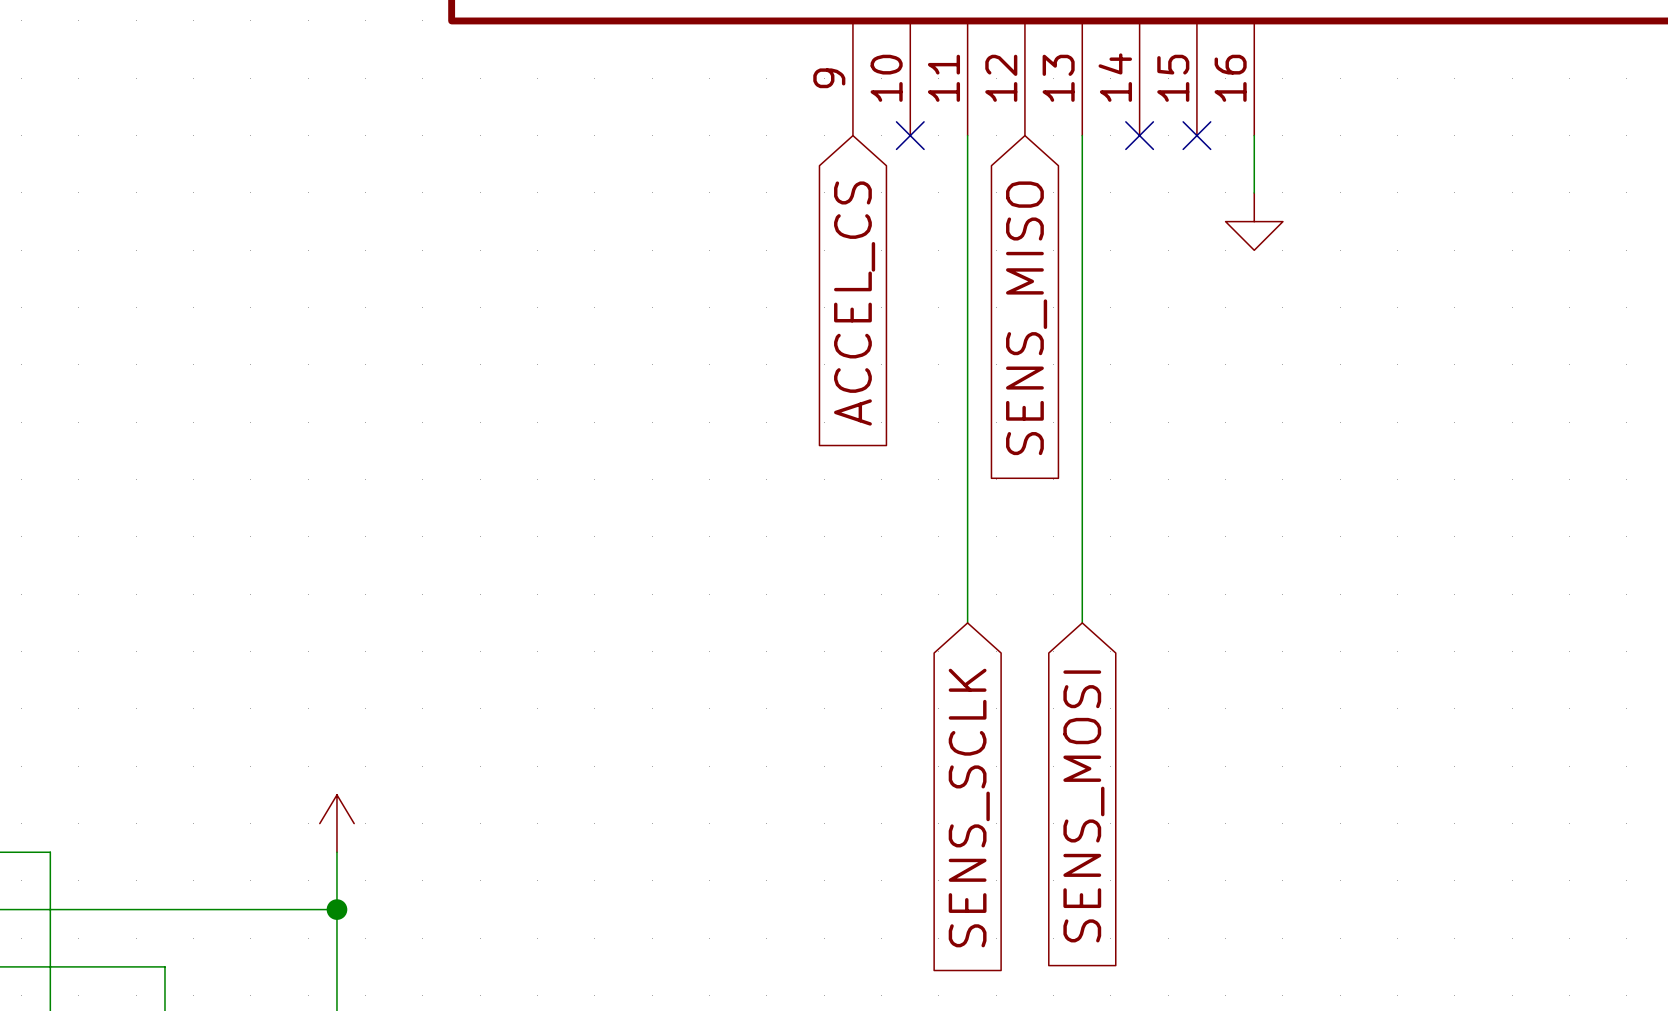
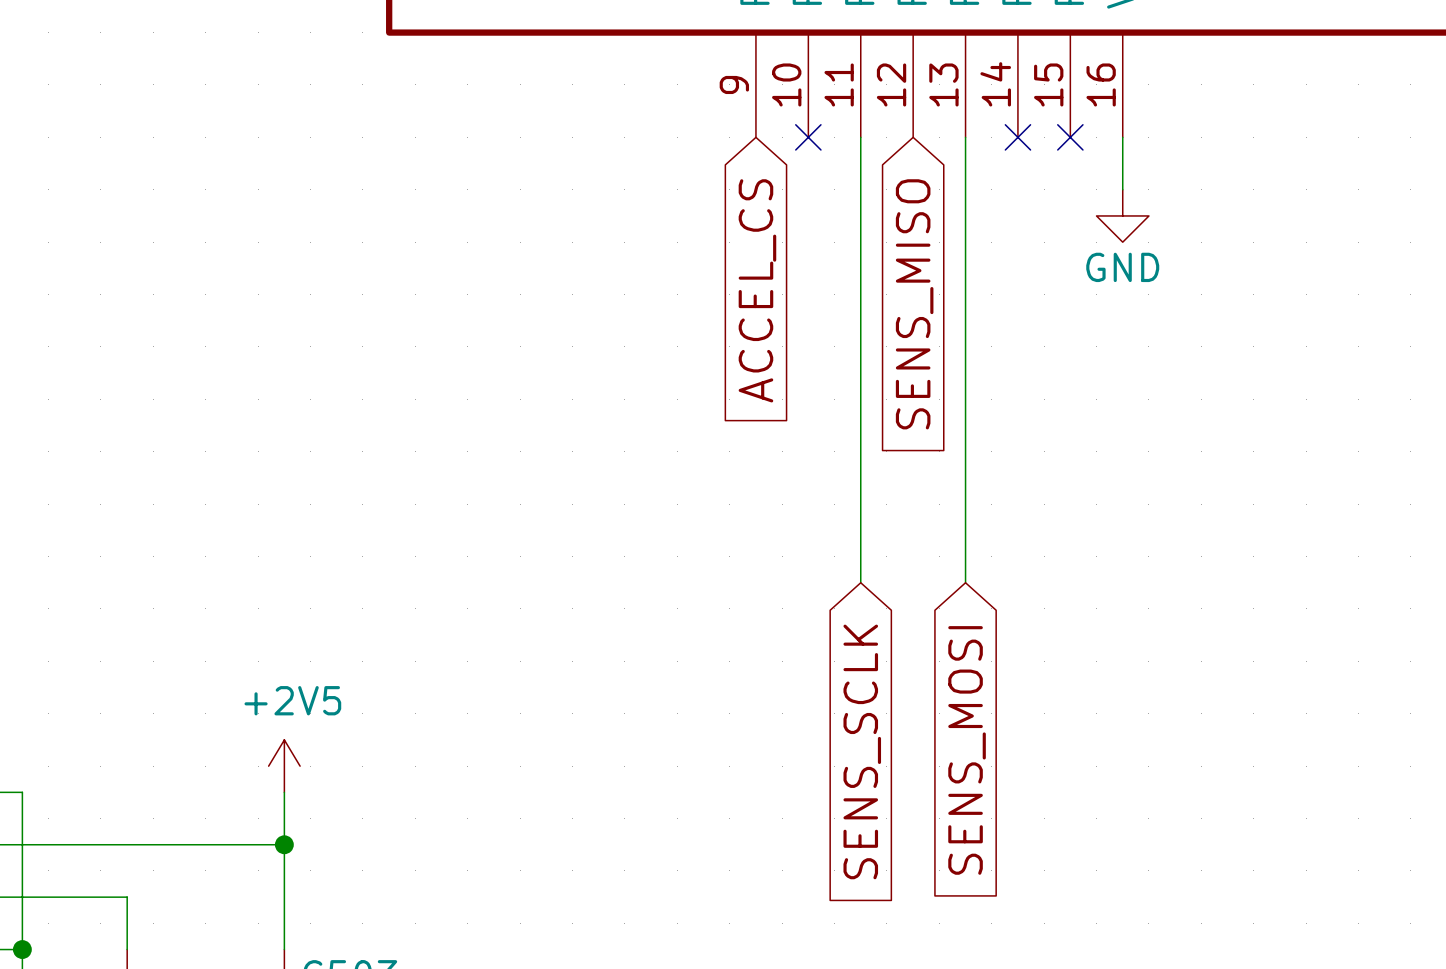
power symbol text: none -> GND (1122, 267)
power symbol text: none -> +2V5 (292, 700)

